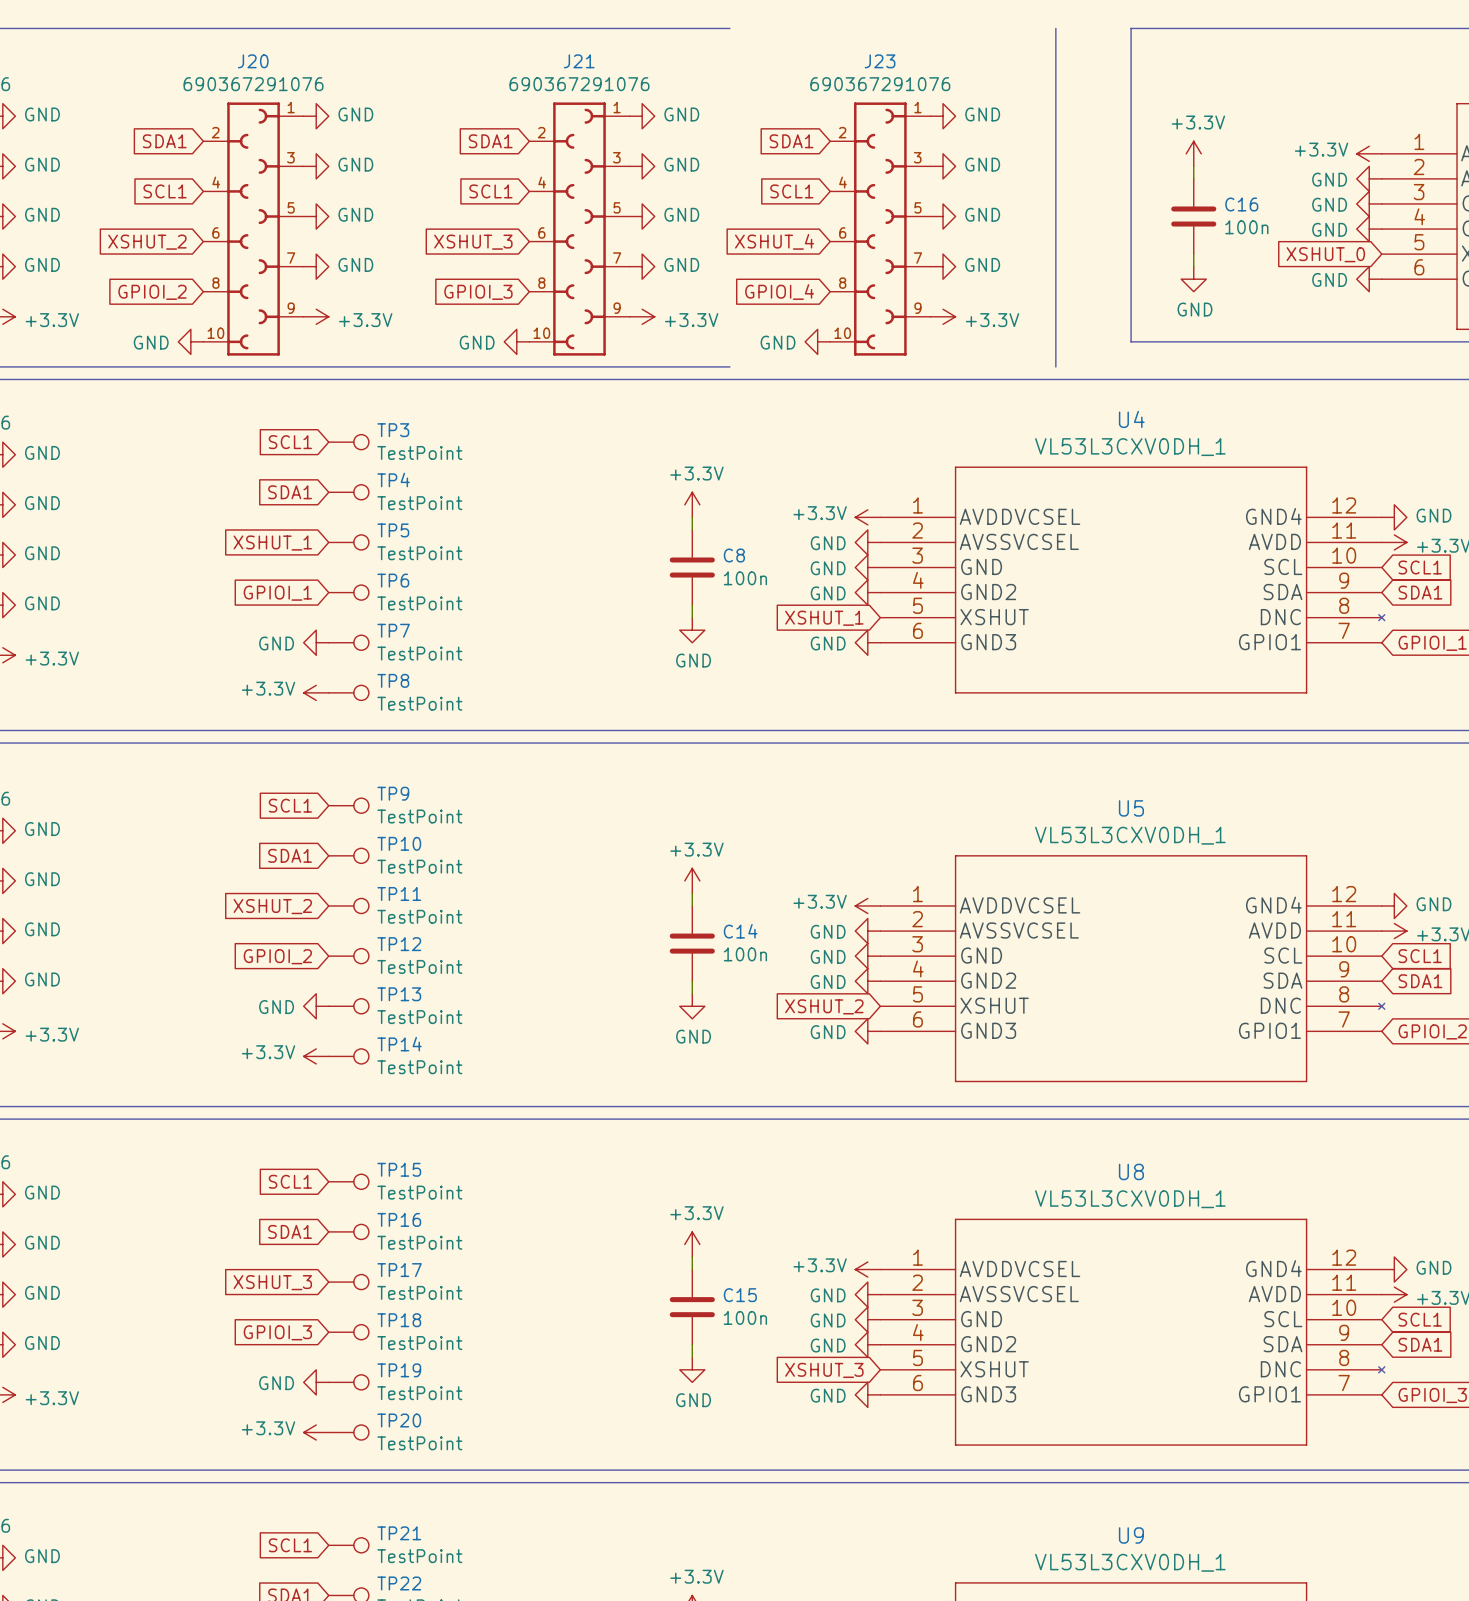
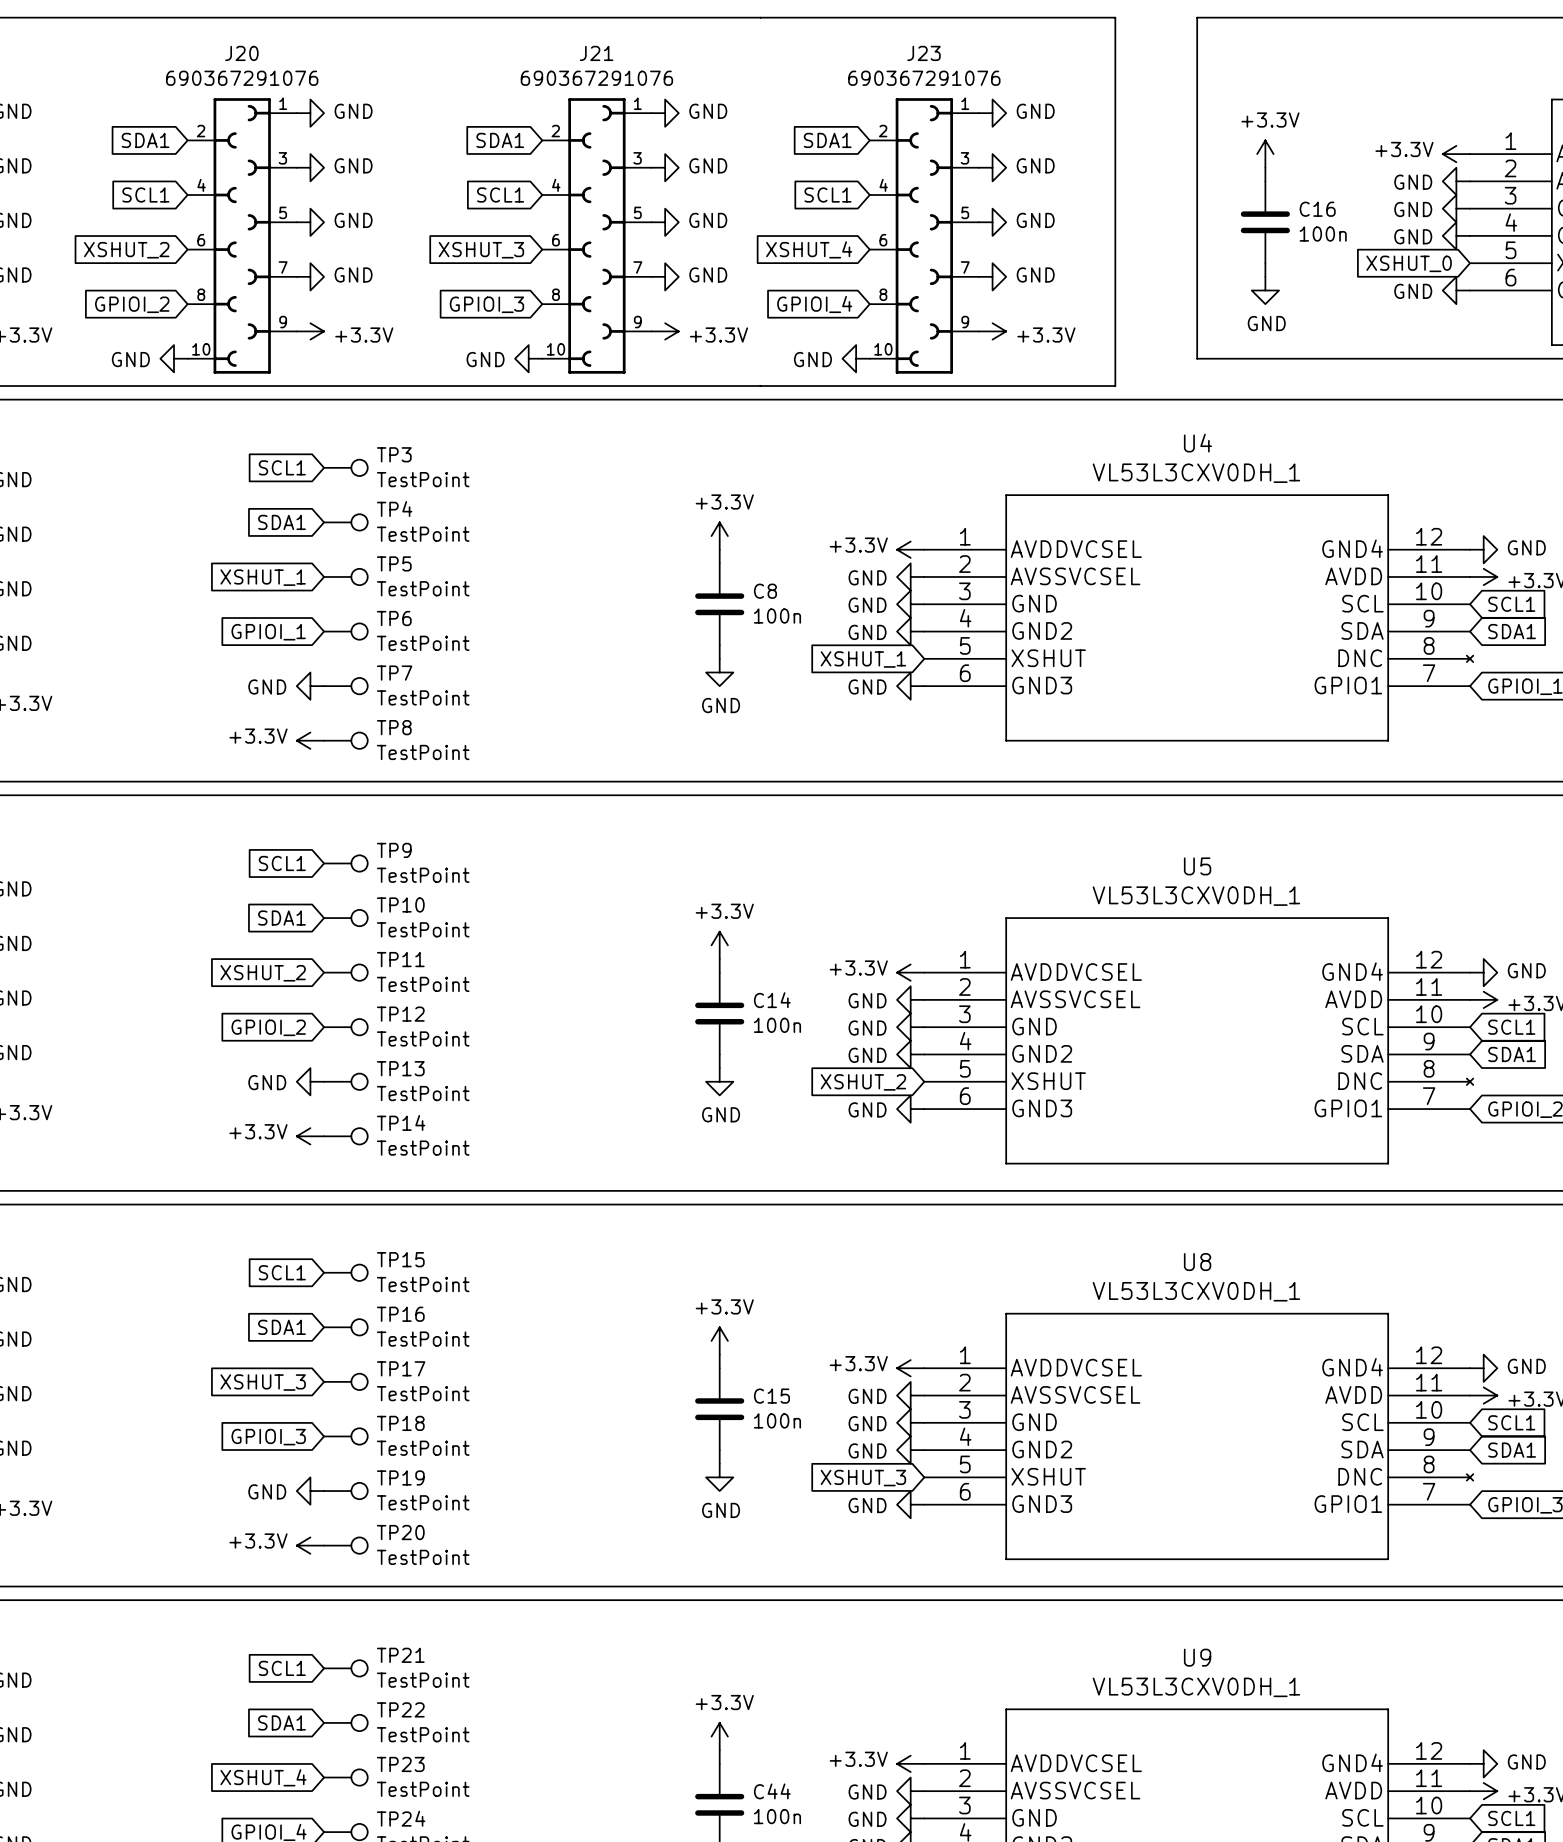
line: none -> (760, 17) (1115, 17)
line: none -> (760, 386) (1115, 386)

